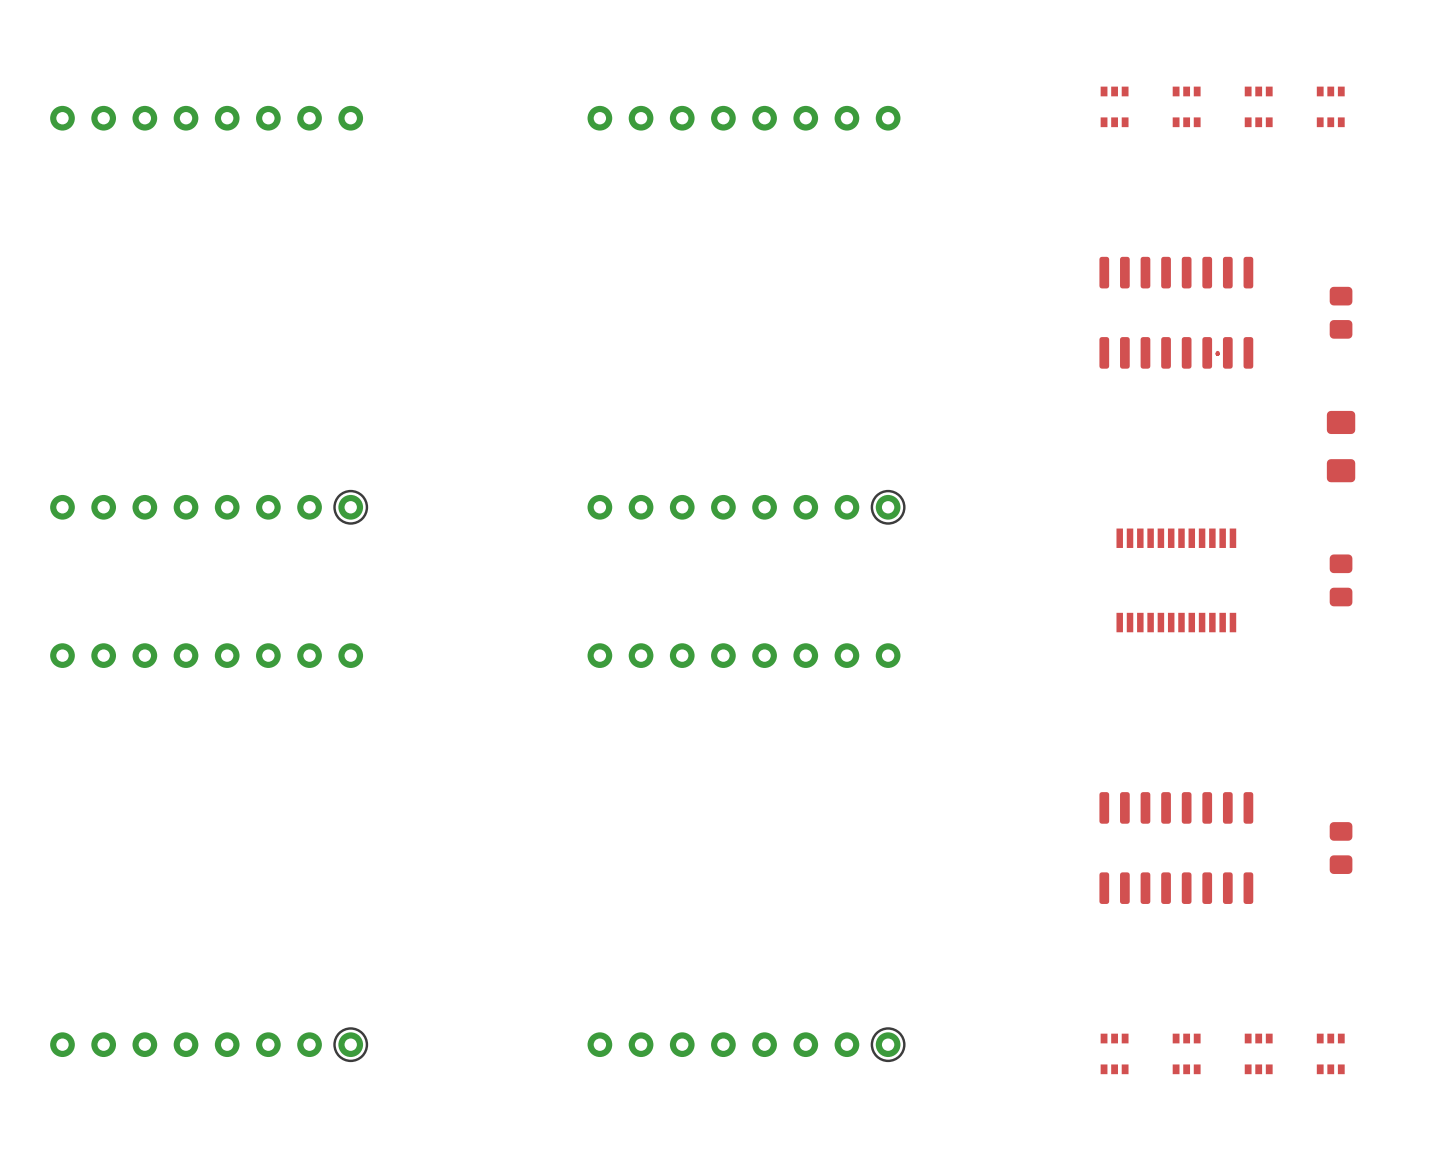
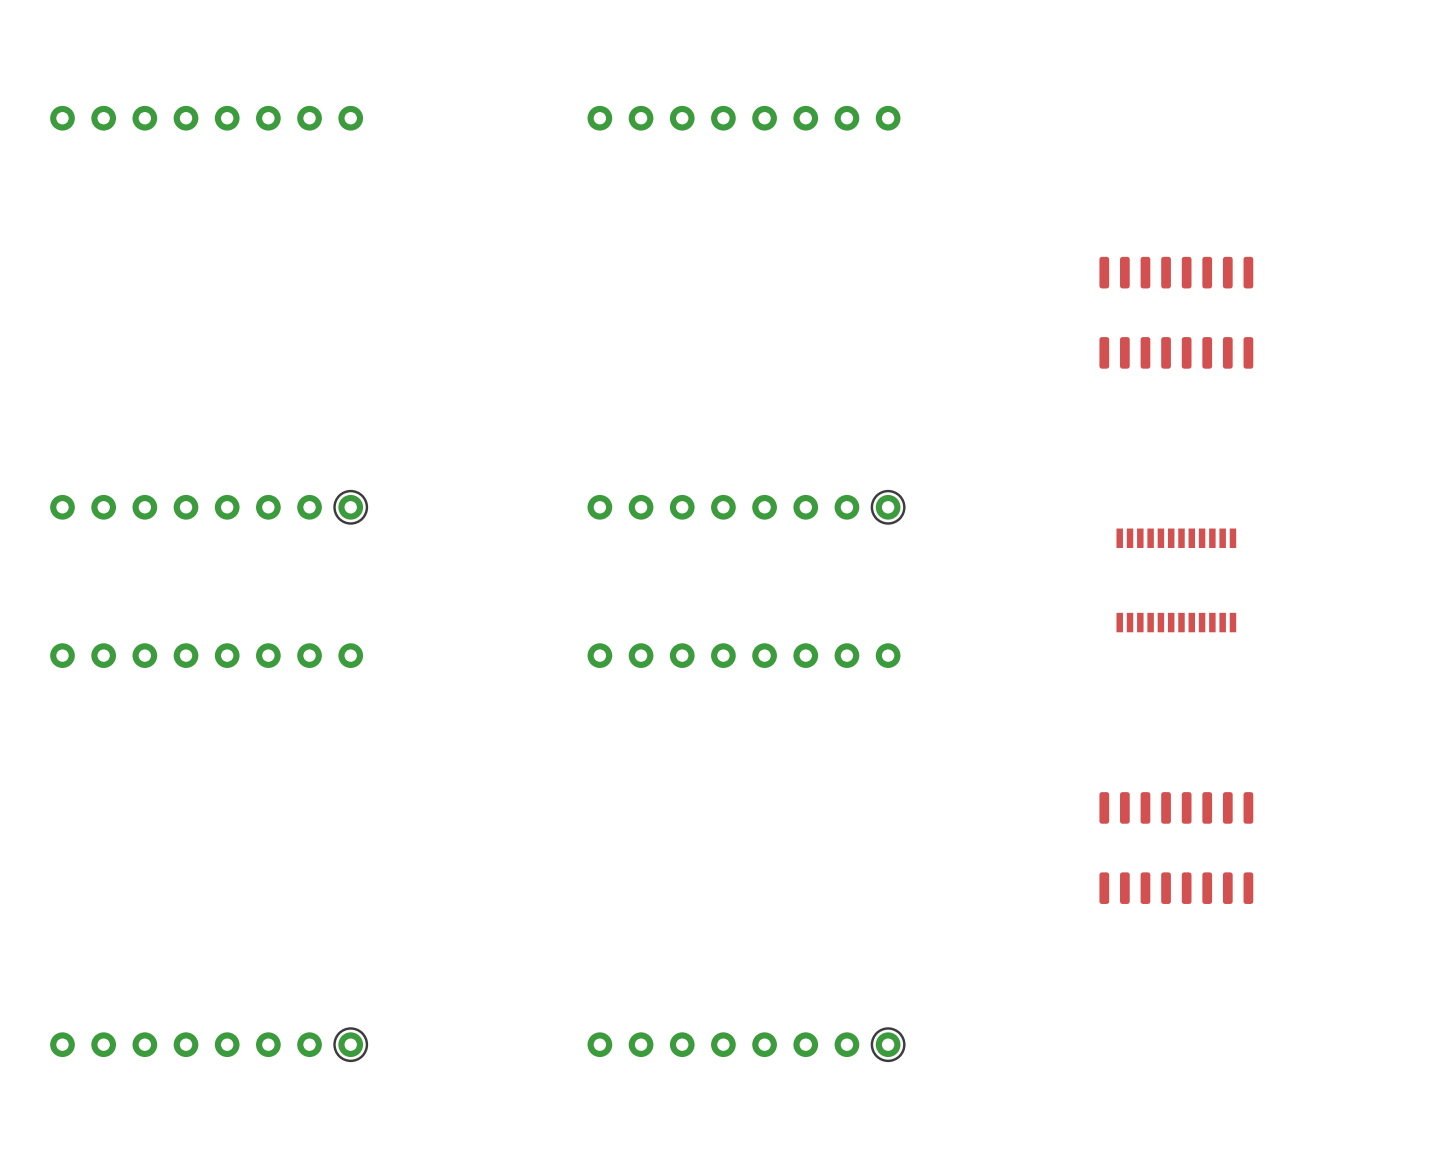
part: (1114, 106) -> none
part: (1186, 106) -> none
part: (1258, 106) -> none
part: (1330, 106) -> none
part: (1341, 312) -> none
top track: (1217, 352) (1217, 353) -> none
part: (1341, 446) -> none
part: (1341, 580) -> none
part: (1341, 848) -> none
part: (1114, 1053) -> none
part: (1186, 1053) -> none
part: (1258, 1053) -> none
part: (1330, 1053) -> none

